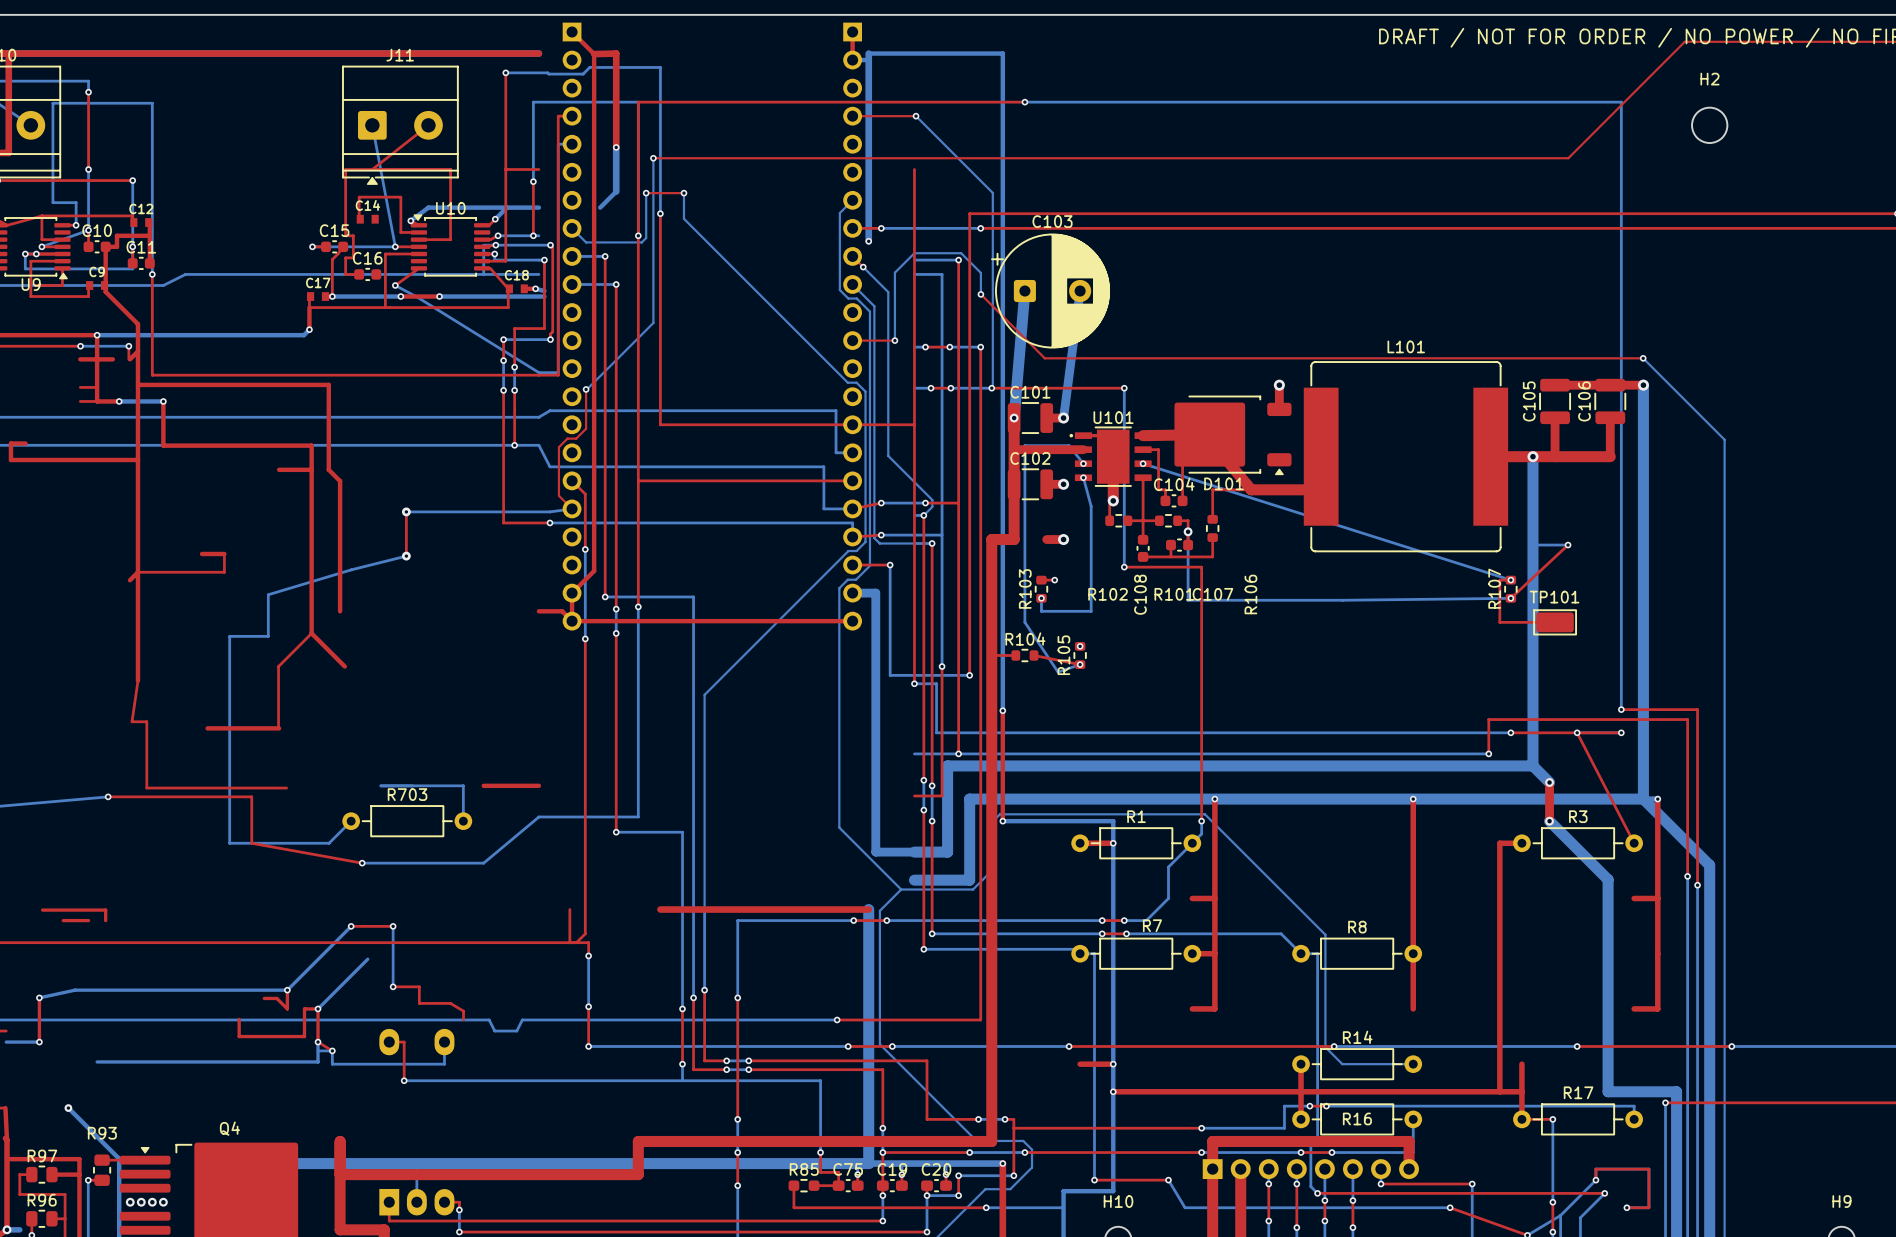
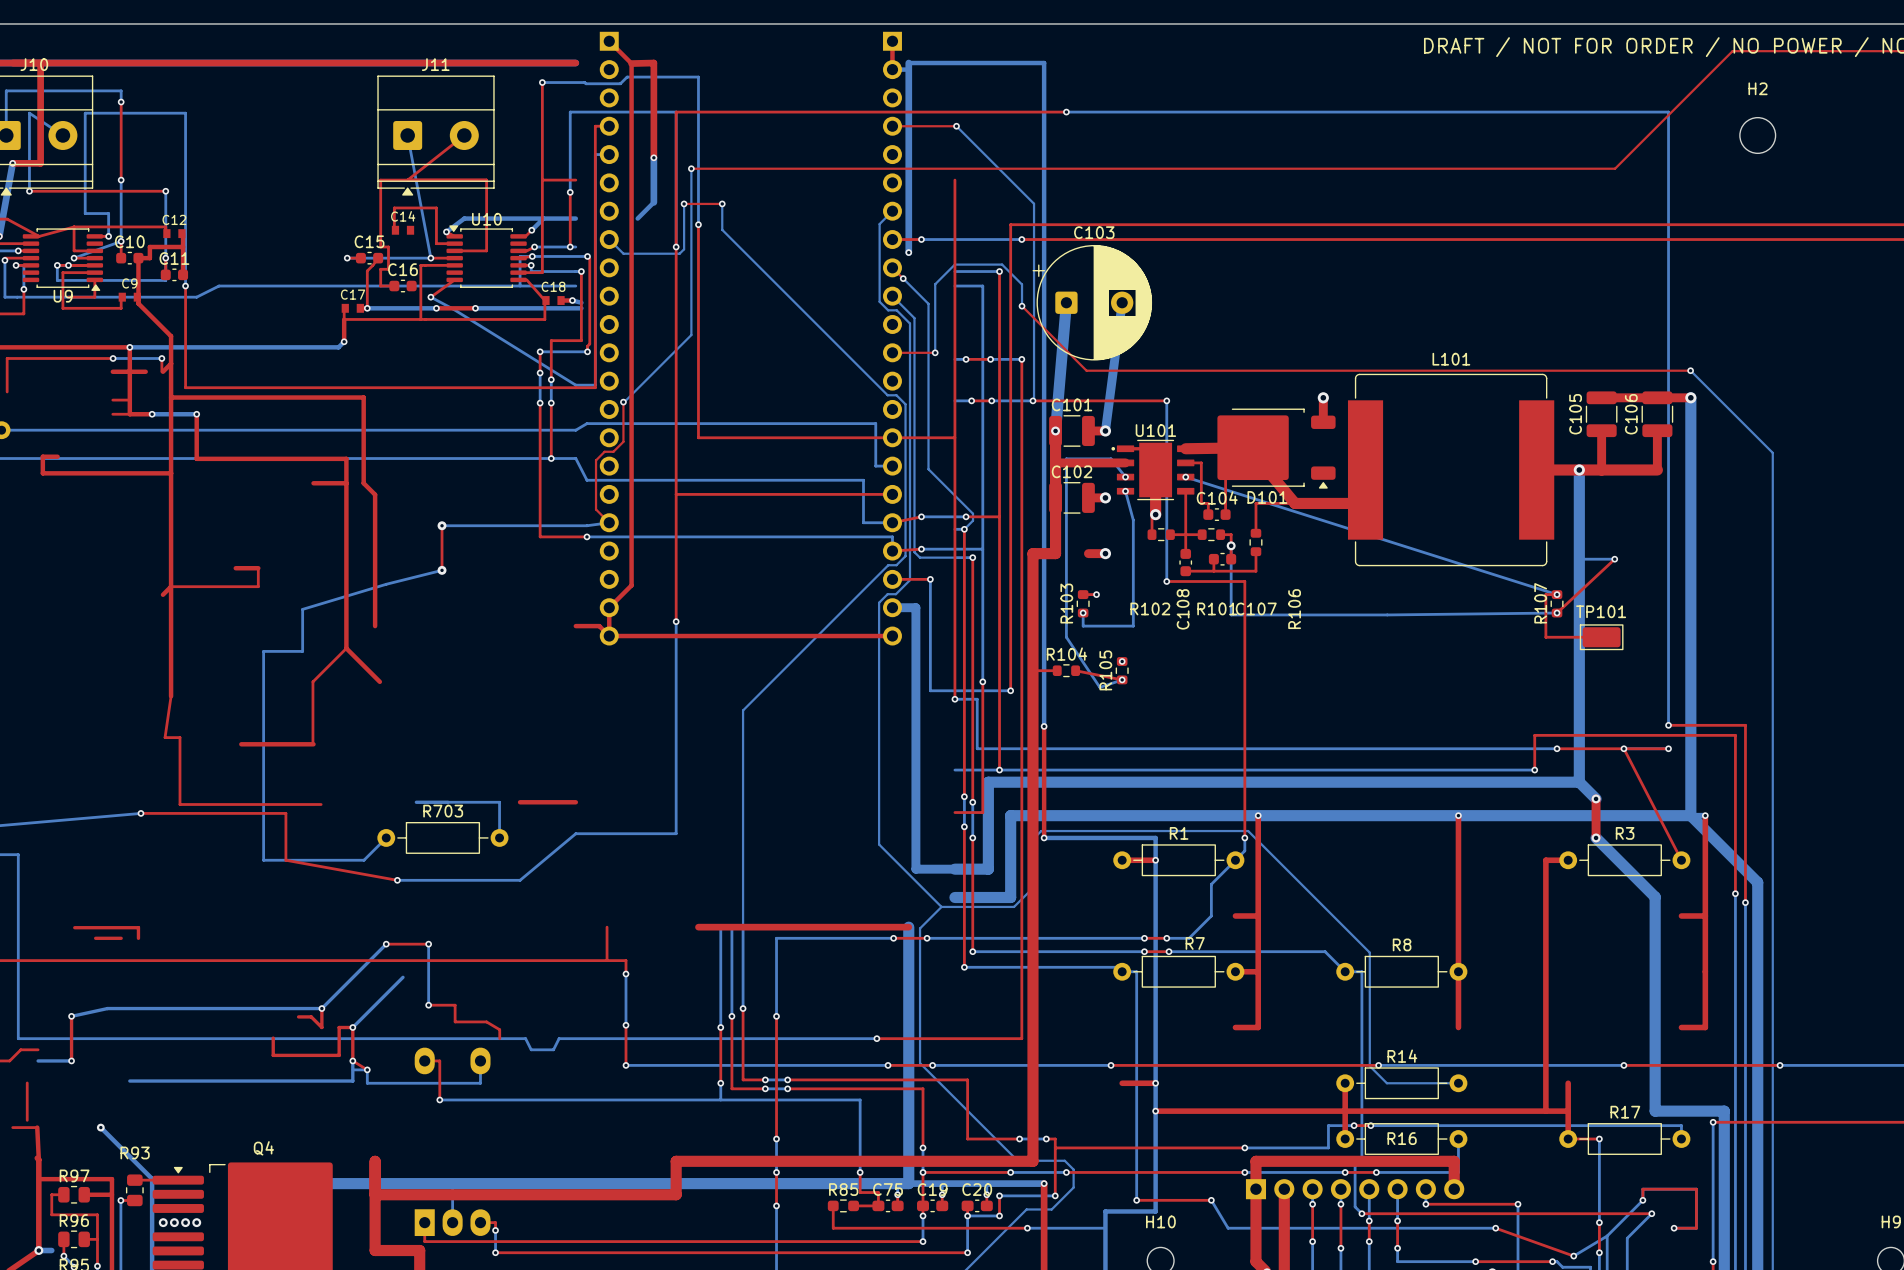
bottom track: (572, 256) (605, 256) -> none
top track: (605, 256) (605, 596) -> none
via: (605, 256) -> none
bottom track: (572, 284) (616, 284) -> none
top track: (616, 284) (616, 609) -> none
via: (616, 284) -> none
top track: (572, 480) (585, 494) (585, 549) -> none
bottom track: (585, 549) (585, 638) -> none
via: (585, 549) -> none
bottom track: (605, 596) (693, 596) (693, 909) -> none
via: (605, 596) -> none
bottom track: (616, 609) (616, 633) -> none
via: (616, 609) -> none
top track: (616, 633) (616, 832) -> none
via: (616, 633) -> none
top track: (585, 638) (585, 933) (576, 942) -> none
via: (585, 638) -> none
bottom track: (616, 832) (682, 832) (682, 909) -> none
via: (616, 832) -> none

